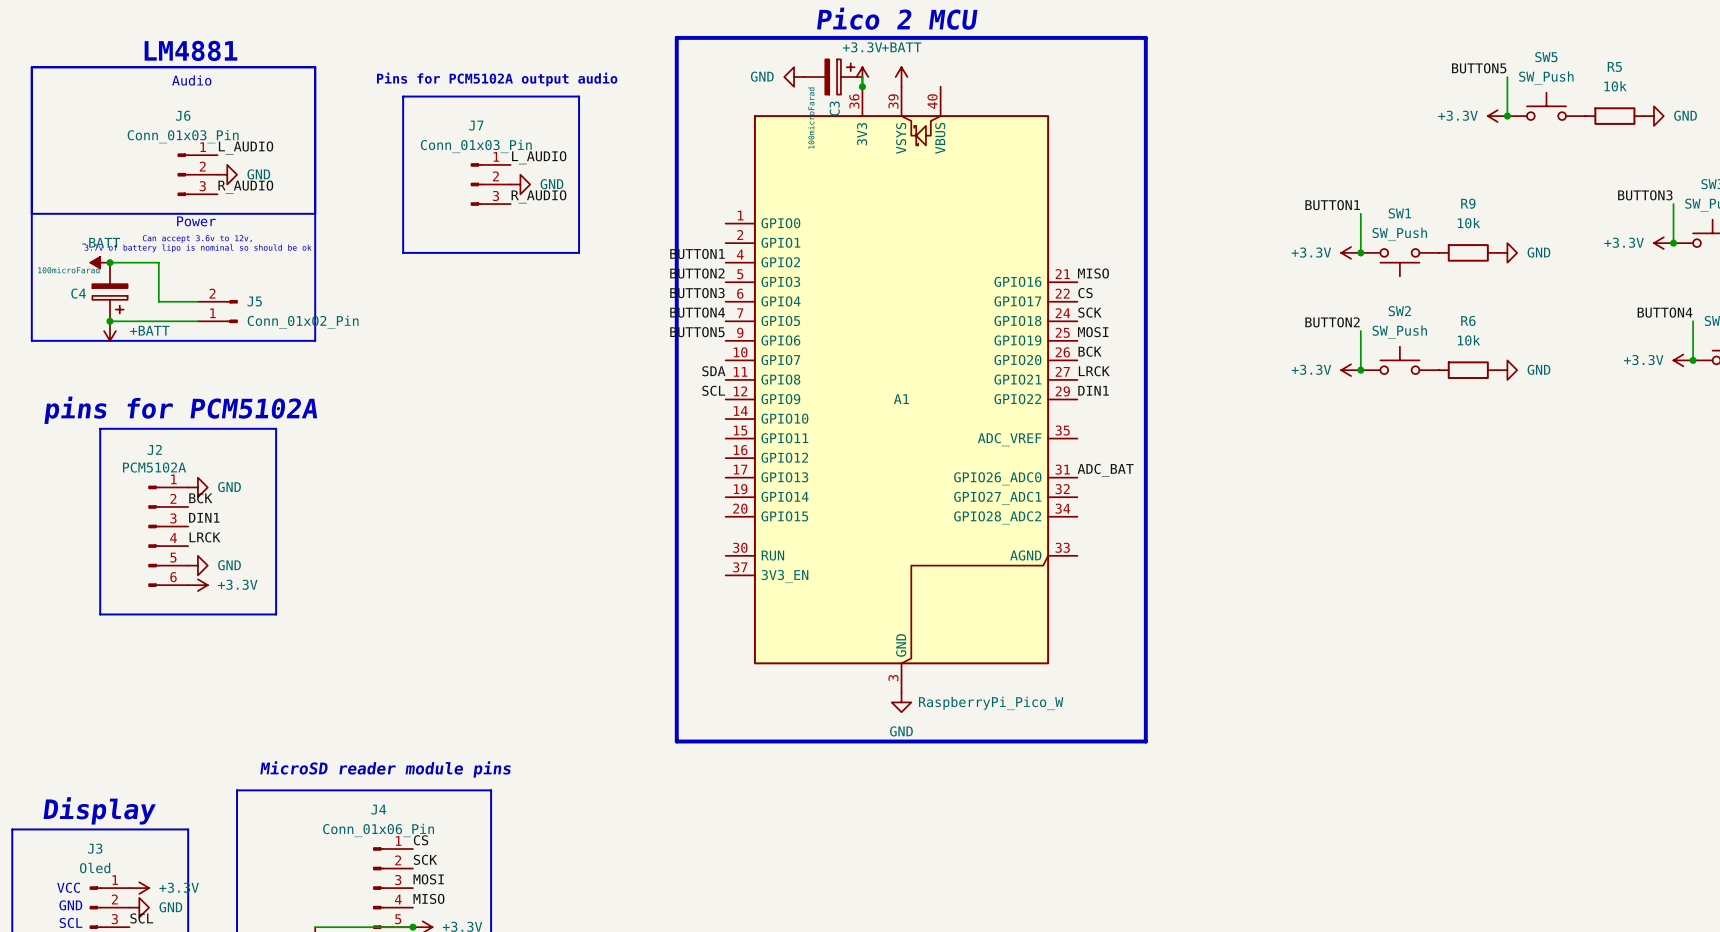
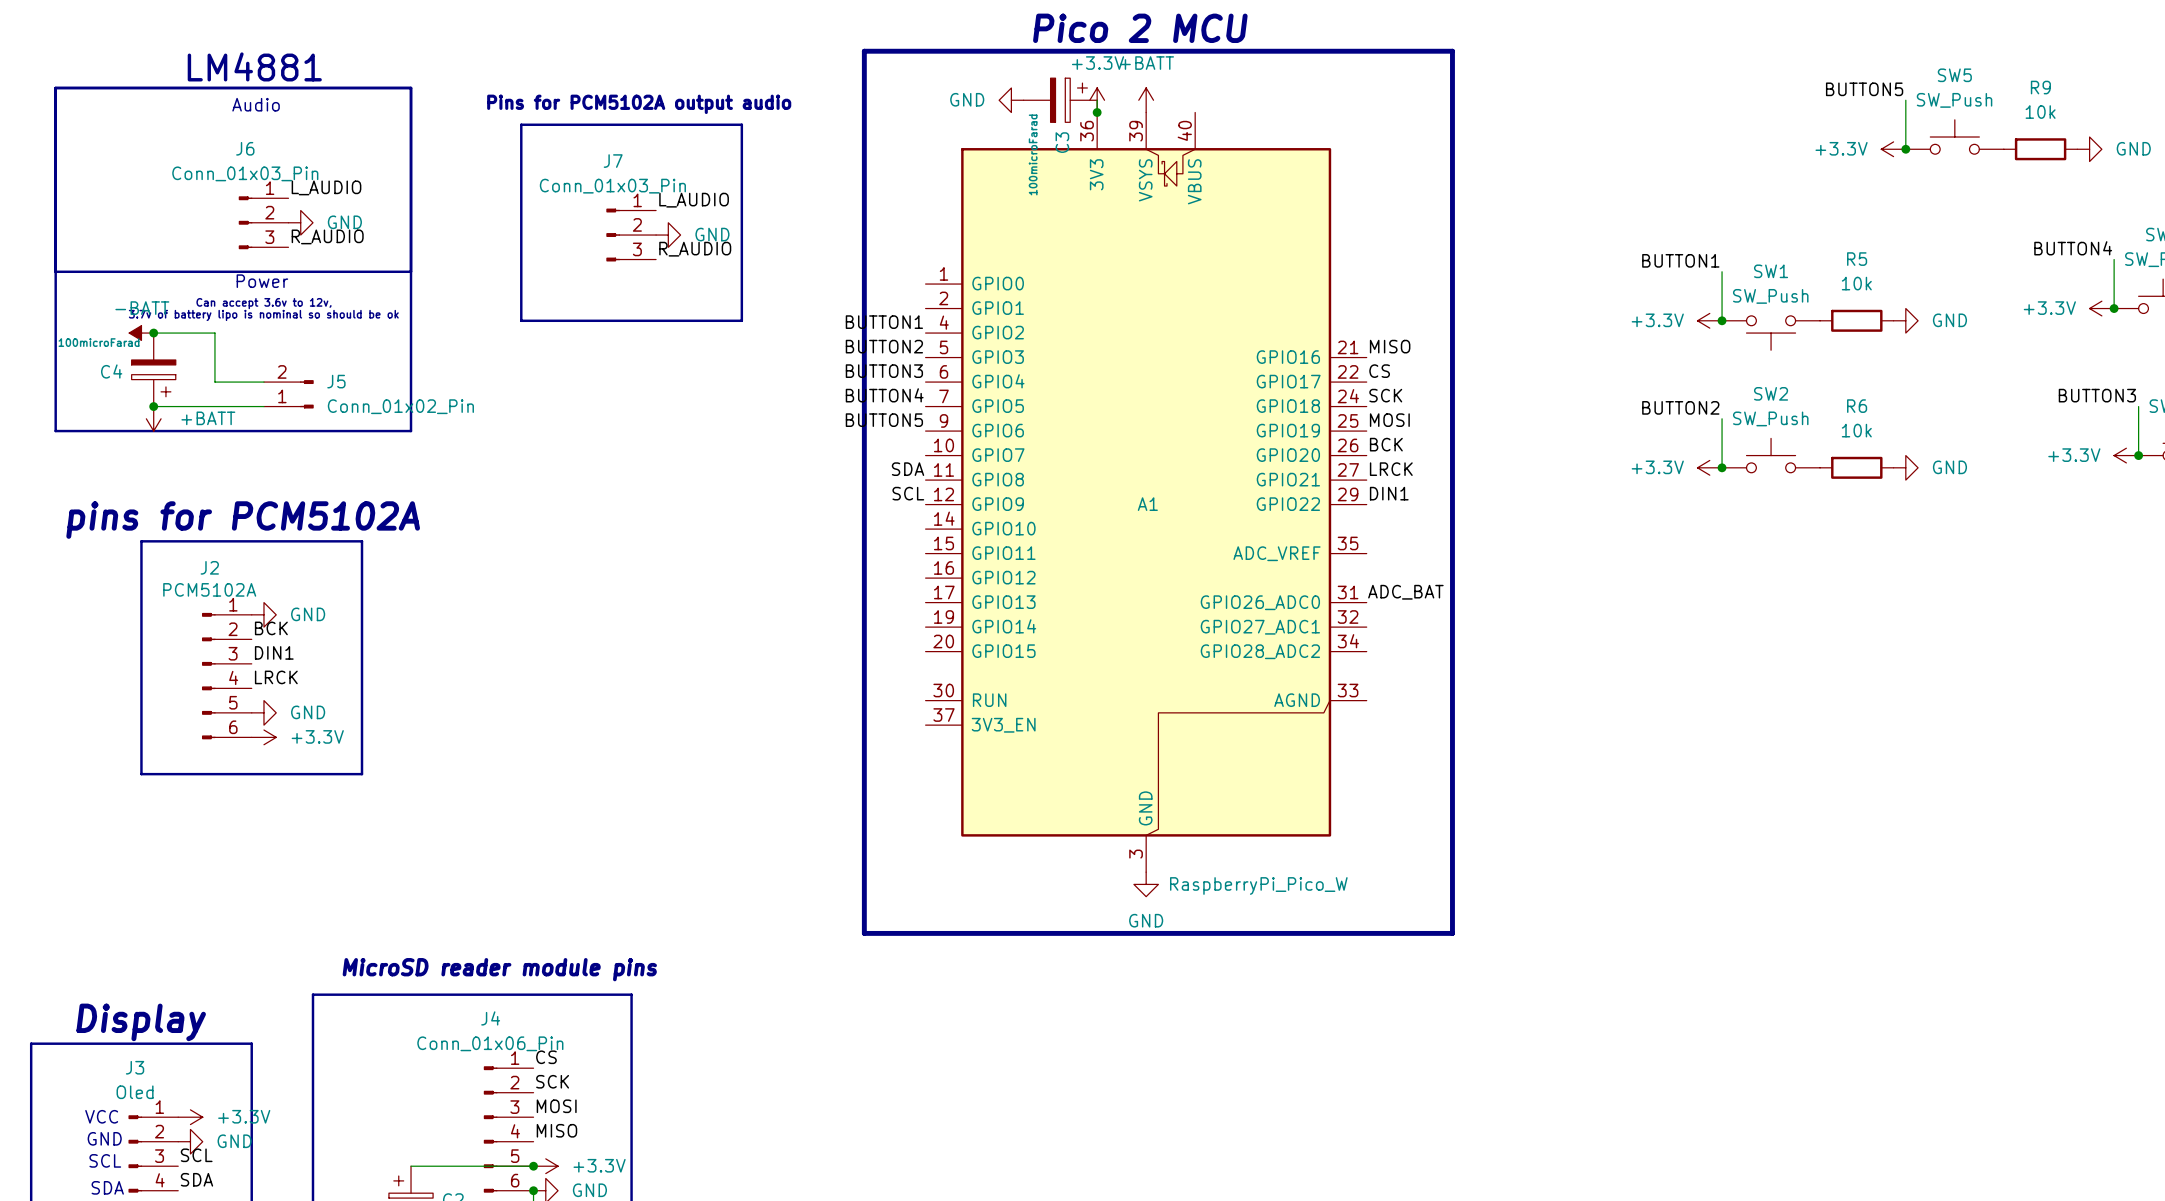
R5 name: R5 (1614, 66) -> R9 (2040, 87)
label: BUTTON3 (1645, 195) -> BUTTON4 (2073, 248)
R9 name: R9 (1468, 203) -> R5 (1857, 259)
label: BUTTON4 (1665, 312) -> BUTTON3 (2097, 395)

